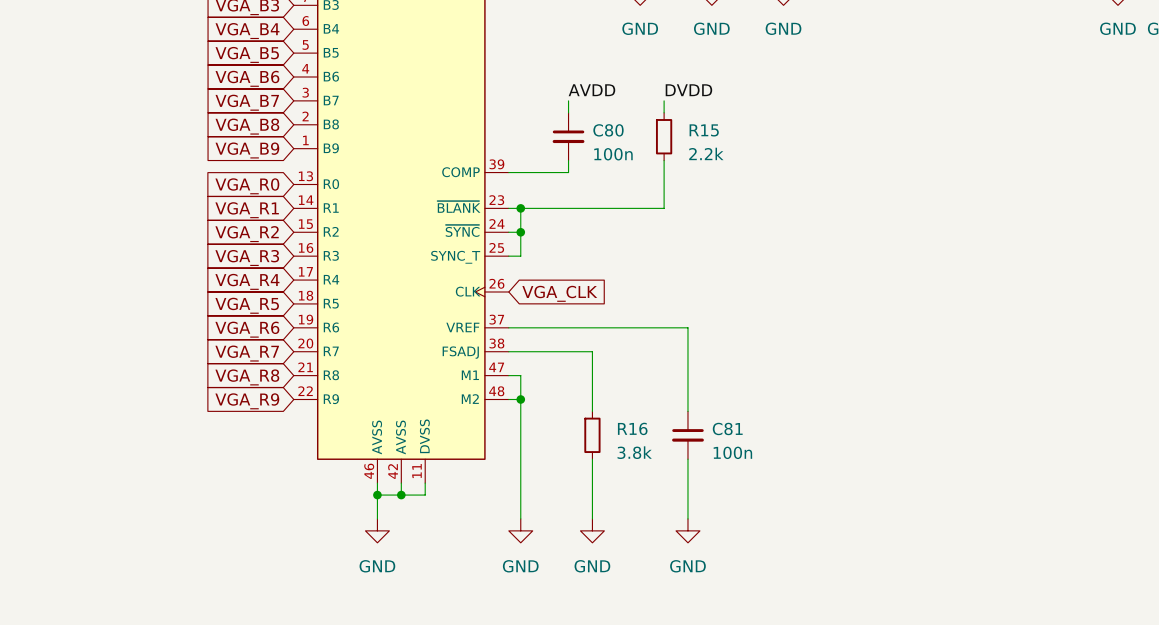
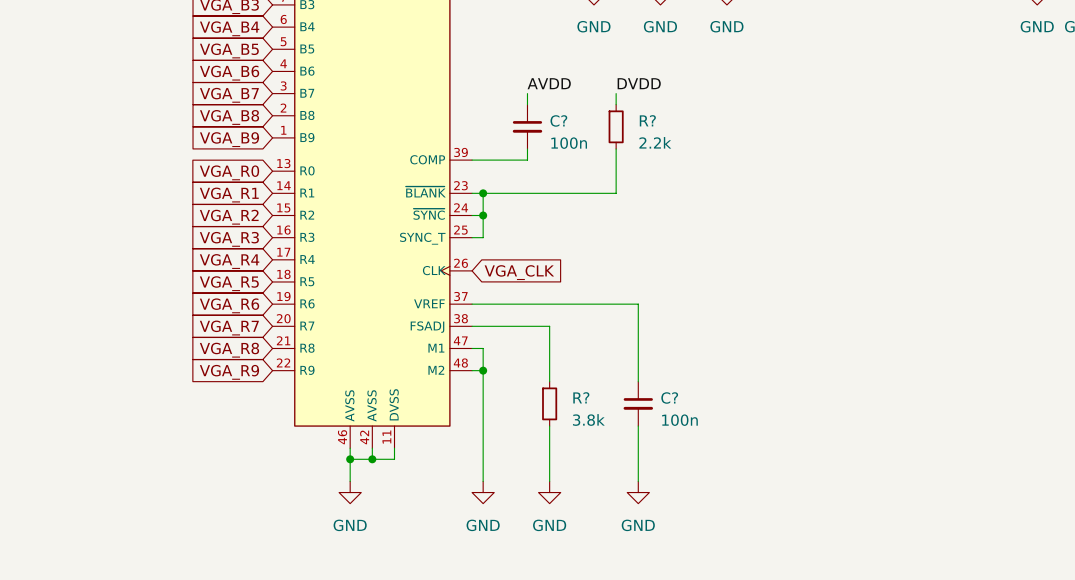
C80 name: C80 (608, 130) -> C? (558, 120)
R15 name: R15 (704, 130) -> R? (647, 120)
R16 name: R16 (632, 428) -> R? (581, 397)
C81 name: C81 (727, 428) -> C? (669, 398)

